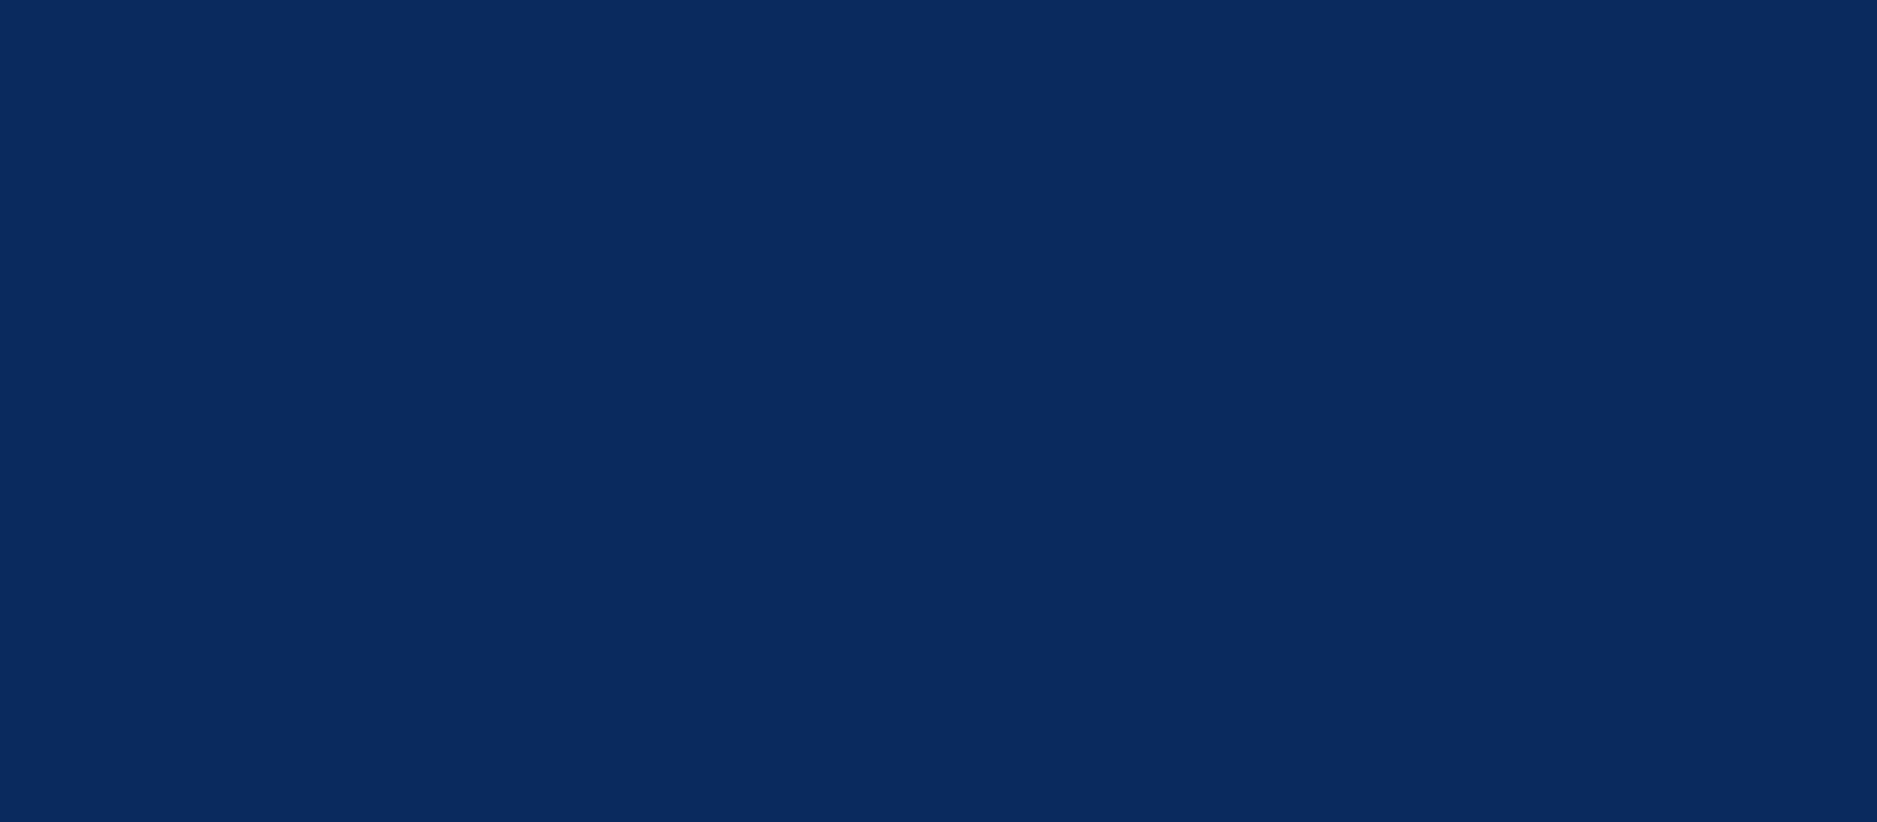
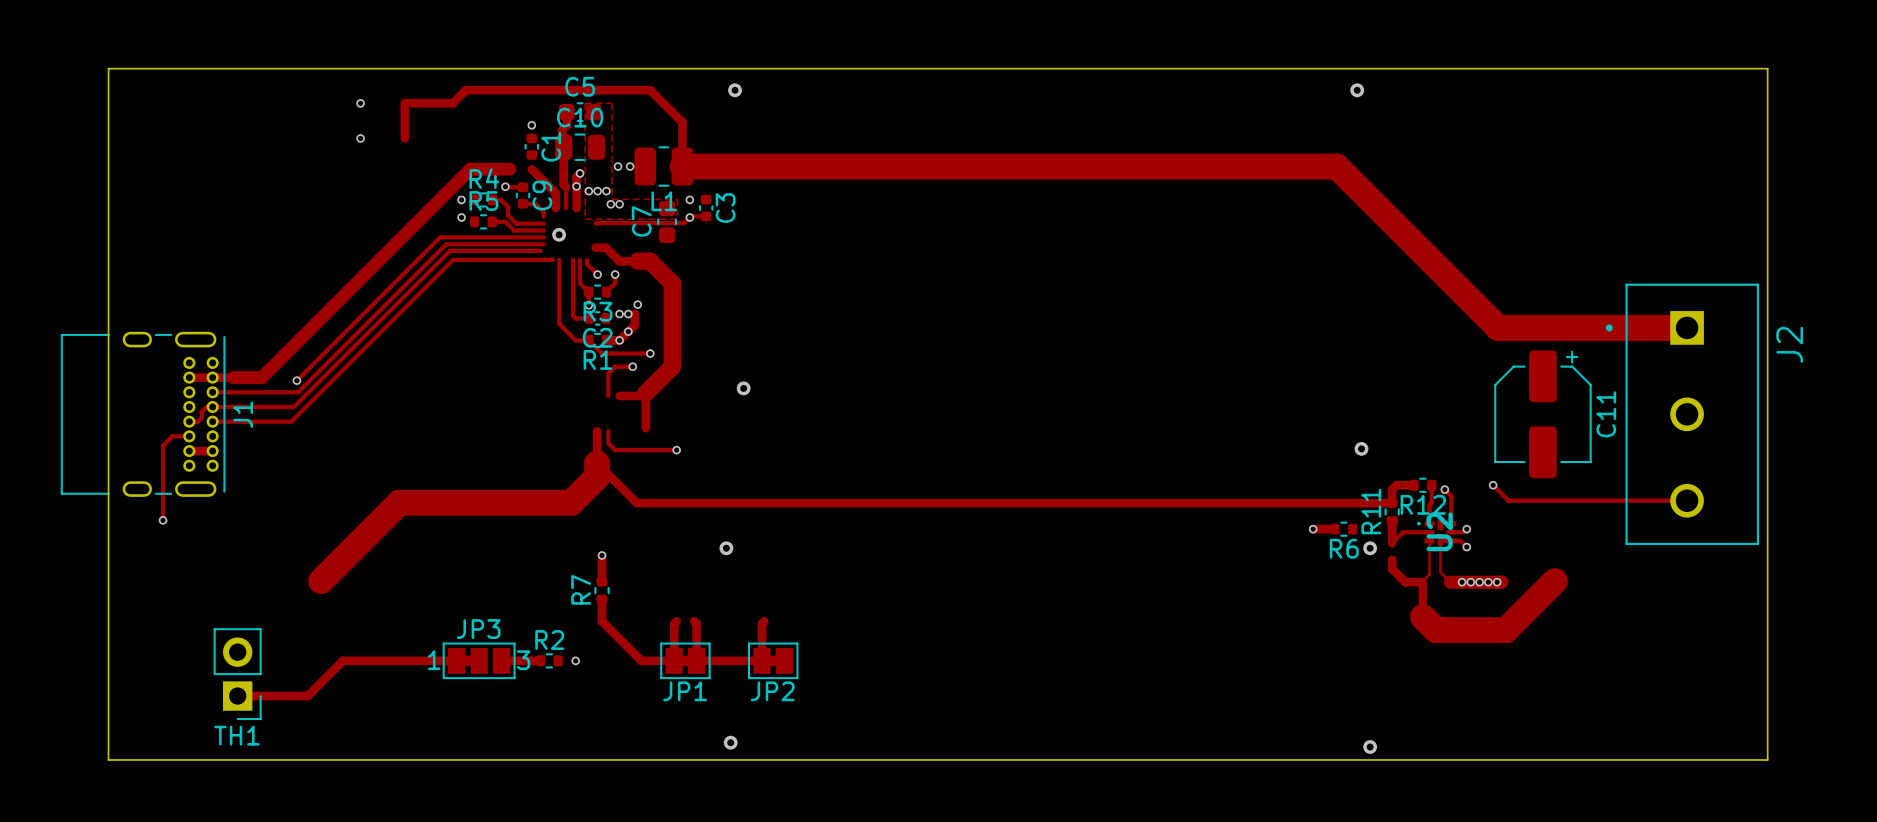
board edge: none -> (108, 68) (1767, 68) (1767, 759) (108, 759) (108, 68)
via: none -> (735, 90)
via: none -> (1357, 90)
via: none -> (360, 103)
zone outline: none -> (585, 103) (612, 103) (612, 199) (677, 199) (677, 219) (585, 219) (585, 103)
track: none -> (566, 112) (566, 125) (562, 129) (566, 208)
C5: none -> (580, 112)
via: none -> (531, 125)
via: none -> (360, 138)
track: none -> (404, 138) (404, 103) (452, 103) (465, 90) (650, 90) (682, 122) (682, 166) (1336, 166) (1498, 327) (1687, 327)
C1: none -> (531, 146)
C10: none -> (580, 147)
via: none -> (618, 166)
via: none -> (630, 166)
L1: none -> (663, 166)
track: none -> (509, 169) (470, 169) (261, 377) (189, 377)
track: none -> (531, 169) (555, 193) (555, 208)
track: none -> (580, 173) (576, 176) (576, 208)
via: none -> (580, 173)
track: none -> (505, 186) (523, 187)
via: none -> (505, 186)
via: none -> (576, 186)
via: none -> (588, 191)
via: none -> (597, 191)
via: none -> (606, 191)
C9: none -> (523, 195)
via: none -> (461, 199)
R4: none -> (483, 199)
track: none -> (492, 199) (501, 199) (508, 207) (508, 215) (516, 223) (543, 223)
via: none -> (689, 199)
track: none -> (523, 203) (535, 203) (543, 212) (543, 216)
via: none -> (610, 204)
via: none -> (619, 204)
C3: none -> (706, 208)
track: none -> (706, 216) (691, 216) (684, 223) (595, 223)
via: none -> (461, 217)
via: none -> (689, 217)
R5: none -> (483, 221)
track: none -> (492, 221) (505, 221) (514, 230) (543, 230)
C7: none -> (667, 221)
via: none -> (559, 234)
track: none -> (543, 237) (440, 237) (296, 380)
track: none -> (543, 244) (446, 244) (298, 392) (212, 392)
track: none -> (595, 247) (605, 247) (619, 261) (637, 261)
track: none -> (540, 250) (450, 250) (351, 349)
track: none -> (551, 259) (453, 259) (291, 421) (212, 421)
track: none -> (559, 259) (559, 324) (575, 340) (588, 340) (601, 353) (650, 353)
track: none -> (573, 259) (573, 315) (575, 318) (589, 318)
track: none -> (580, 259) (580, 283) (588, 292) (588, 305)
track: none -> (586, 259) (586, 263) (597, 274)
track: none -> (637, 261) (650, 261) (672, 283) (672, 366) (645, 393)
via: none -> (597, 274)
track: none -> (615, 274) (615, 283) (606, 292)
via: none -> (615, 274)
R3: none -> (597, 292)
via: none -> (637, 304)
via: none -> (588, 305)
via: none -> (619, 314)
via: none -> (628, 314)
track: none -> (634, 314) (634, 325) (619, 340) (606, 340)
C2: none -> (597, 318)
via: none -> (628, 331)
R1: none -> (597, 340)
via: none -> (619, 340)
track: none -> (353, 347) (293, 406) (206, 406) (201, 411) (201, 417) (197, 421) (189, 421)
via: none -> (650, 353)
track: none -> (632, 366) (615, 366) (608, 373) (608, 395)
via: none -> (632, 366)
via: none -> (296, 380)
via: none -> (743, 388)
track: none -> (645, 393) (643, 395) (619, 395)
track: none -> (645, 393) (645, 428)
J1: none -> (143, 414)
C11: none -> (1542, 414)
J2: none -> (1682, 414)
track: none -> (597, 431) (597, 463)
track: none -> (608, 431) (608, 443) (615, 450) (676, 450)
track: none -> (189, 436) (172, 436) (163, 445) (163, 520)
via: none -> (1361, 448)
via: none -> (676, 450)
track: none -> (189, 451) (212, 451)
track: none -> (597, 463) (636, 503) (1392, 503) (1392, 489) (1396, 485) (1414, 485)
track: none -> (597, 463) (597, 477) (571, 502) (399, 502) (321, 581)
R12: none -> (1422, 485)
track: none -> (1431, 485) (1429, 523)
track: none -> (1493, 485) (1508, 500) (1687, 500)
via: none -> (1493, 485)
track: none -> (1444, 489) (1451, 496) (1451, 523)
via: none -> (1444, 489)
R11: none -> (1392, 511)
via: none -> (163, 520)
track: none -> (1392, 520) (1392, 543) (1403, 532) (1429, 532)
track: none -> (1313, 529) (1335, 529)
via: none -> (1313, 529)
R6: none -> (1343, 529)
track: none -> (1466, 529) (1463, 532) (1451, 532)
via: none -> (1466, 529)
U2: none -> (1436, 532)
track: none -> (1429, 540) (1429, 574) (1421, 582)
track: none -> (1466, 547) (1460, 540) (1440, 539) (1440, 572) (1450, 582) (1501, 581)
via: none -> (1466, 547)
via: none -> (726, 548)
via: none -> (1370, 548)
track: none -> (602, 555) (602, 581)
via: none -> (602, 555)
track: none -> (1392, 559) (1392, 569) (1405, 582) (1421, 582)
track: none -> (1555, 581) (1506, 630) (1436, 630) (1422, 616) (1421, 582)
via: none -> (1462, 582)
via: none -> (1470, 582)
via: none -> (1479, 582)
via: none -> (1488, 582)
via: none -> (1497, 582)
R7: none -> (602, 590)
track: none -> (602, 599) (602, 621) (641, 660) (674, 660) (674, 623) (676, 621)
track: none -> (694, 621) (696, 623) (696, 660) (761, 660) (761, 623) (764, 621)
track: none -> (456, 660) (343, 660) (307, 696) (237, 696)
JP3: none -> (479, 660)
track: none -> (501, 660) (540, 660)
R2: none -> (549, 660)
via: none -> (575, 660)
JP1: none -> (685, 660)
JP2: none -> (773, 660)
TH1: none -> (237, 674)
via: none -> (730, 742)
via: none -> (1370, 747)

